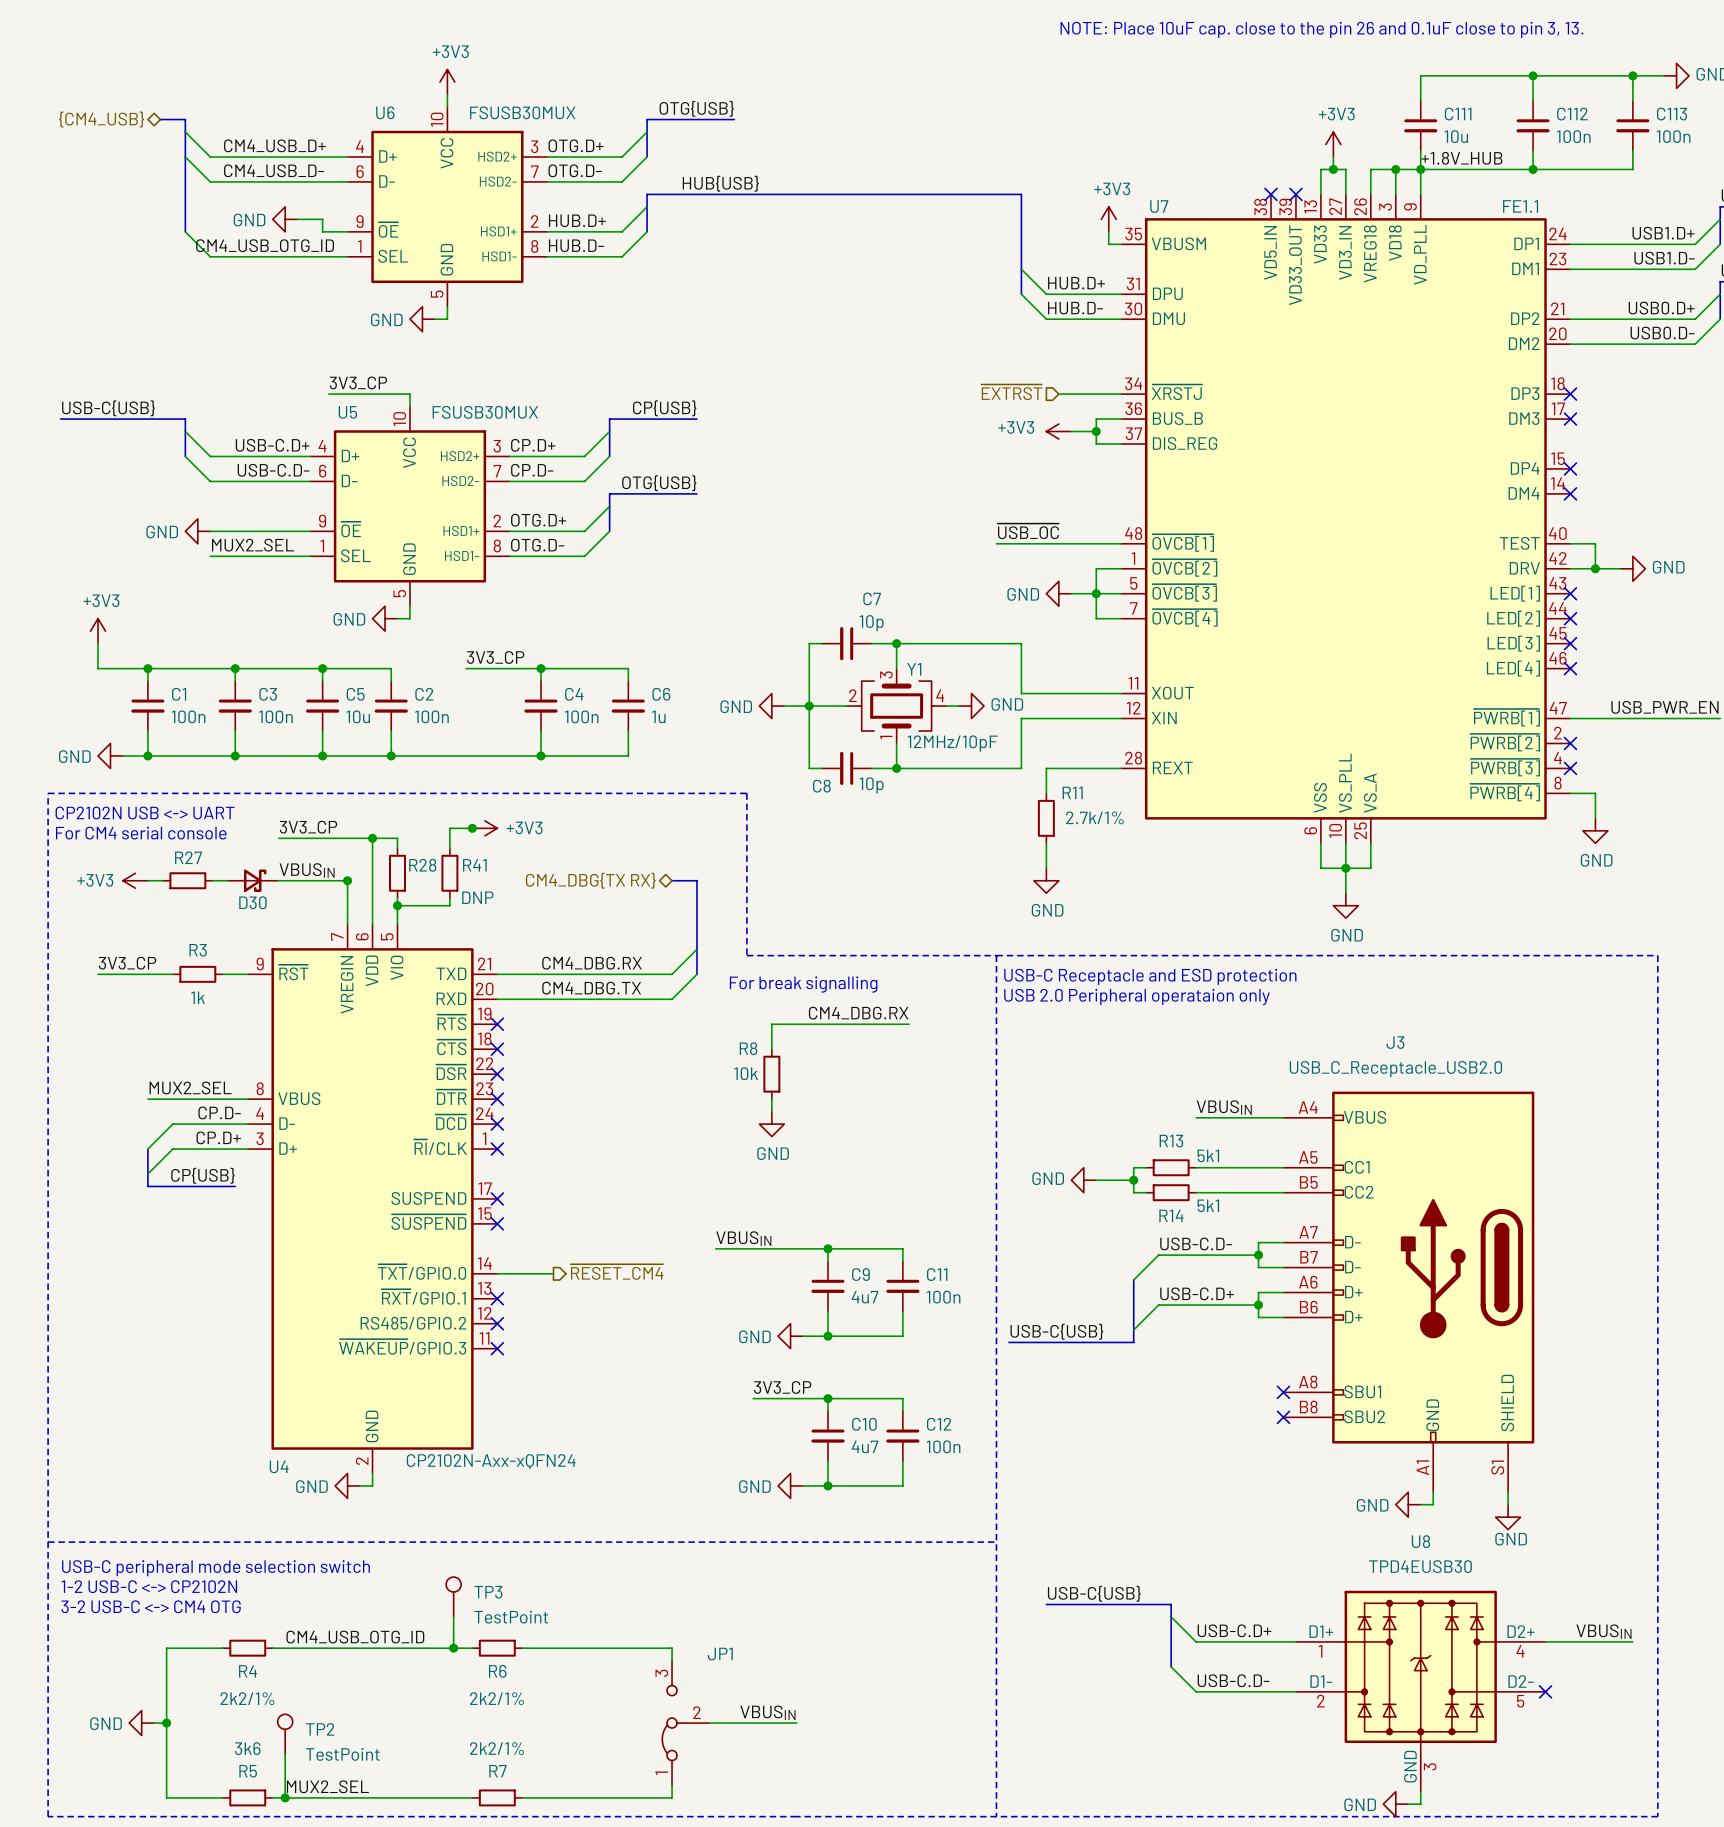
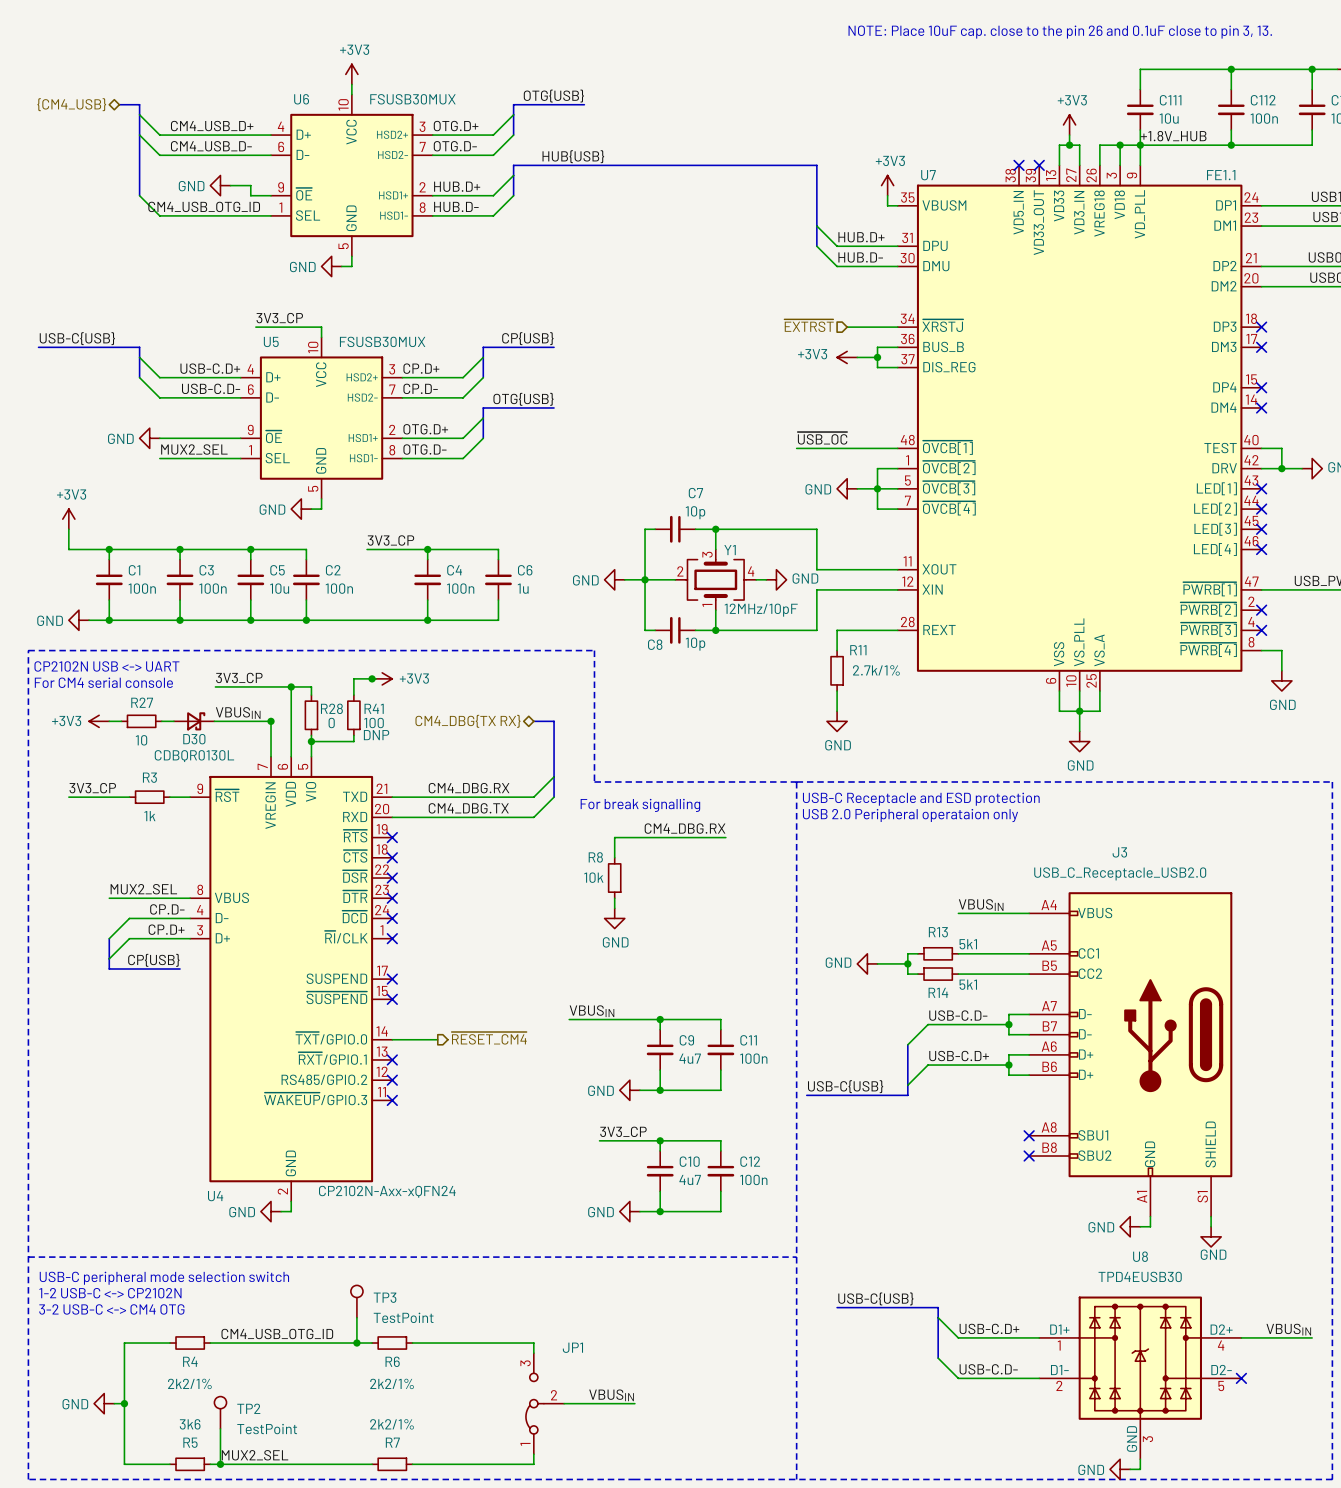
R28 value: none -> 0 (331, 722)
R41 value: none -> 100 (374, 722)
R27 value: none -> 10 (141, 740)
D30 value: none -> CDBQR0130L (194, 756)

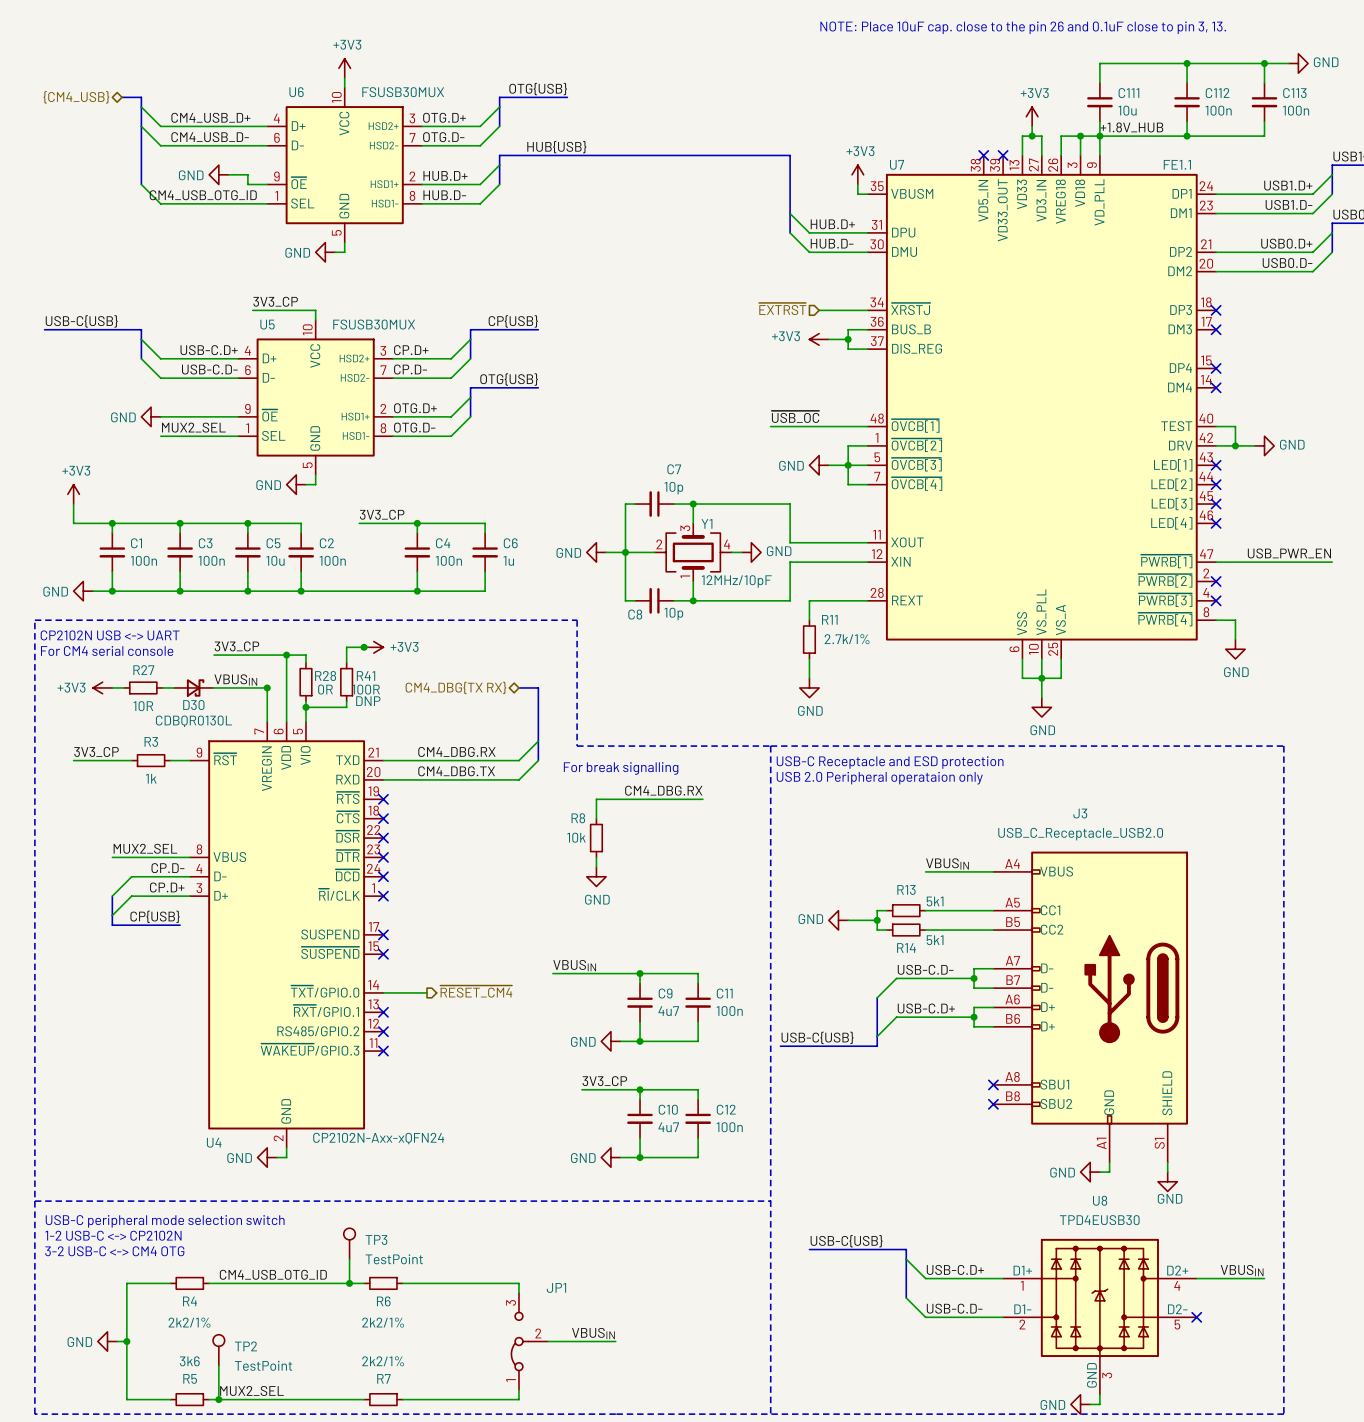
R28 value: 0 (331, 722) -> 0R (325, 689)
R41 value: 100 (374, 722) -> 100R (366, 689)
R27 value: 10 (141, 740) -> 10R (143, 706)

